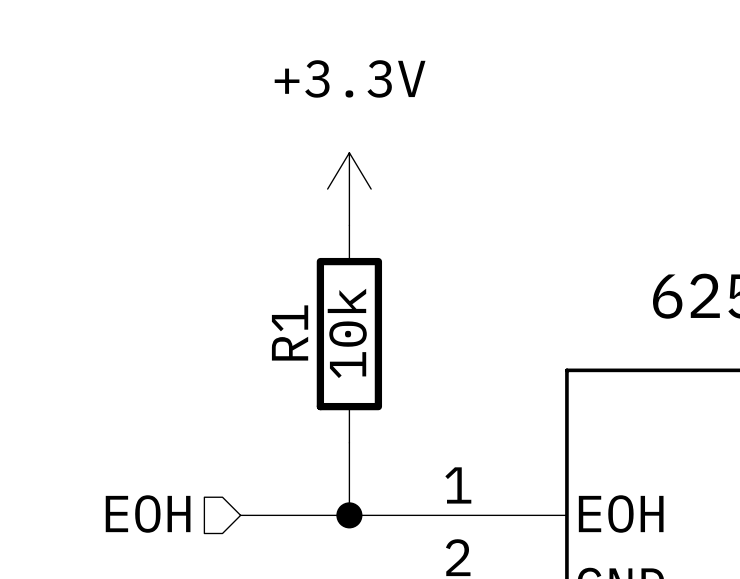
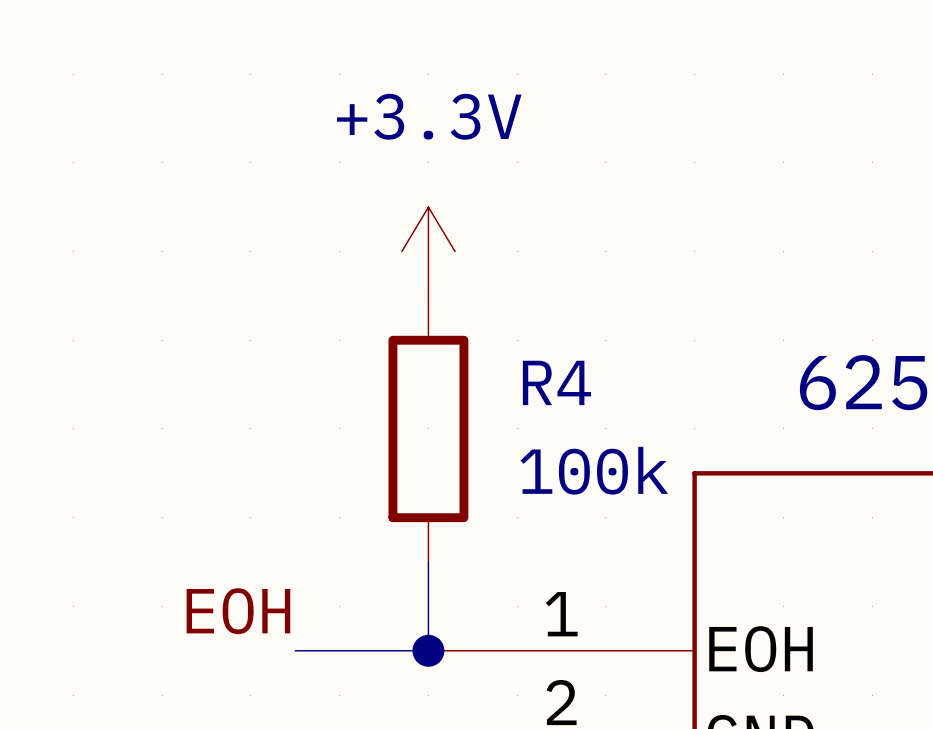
R1 name: R1 (290, 332) -> R4 (556, 382)
R1 value: 10k (347, 333) -> 100k (594, 470)
label: none -> EOH (238, 611)
hierarchical label: EOH (148, 514) -> none

